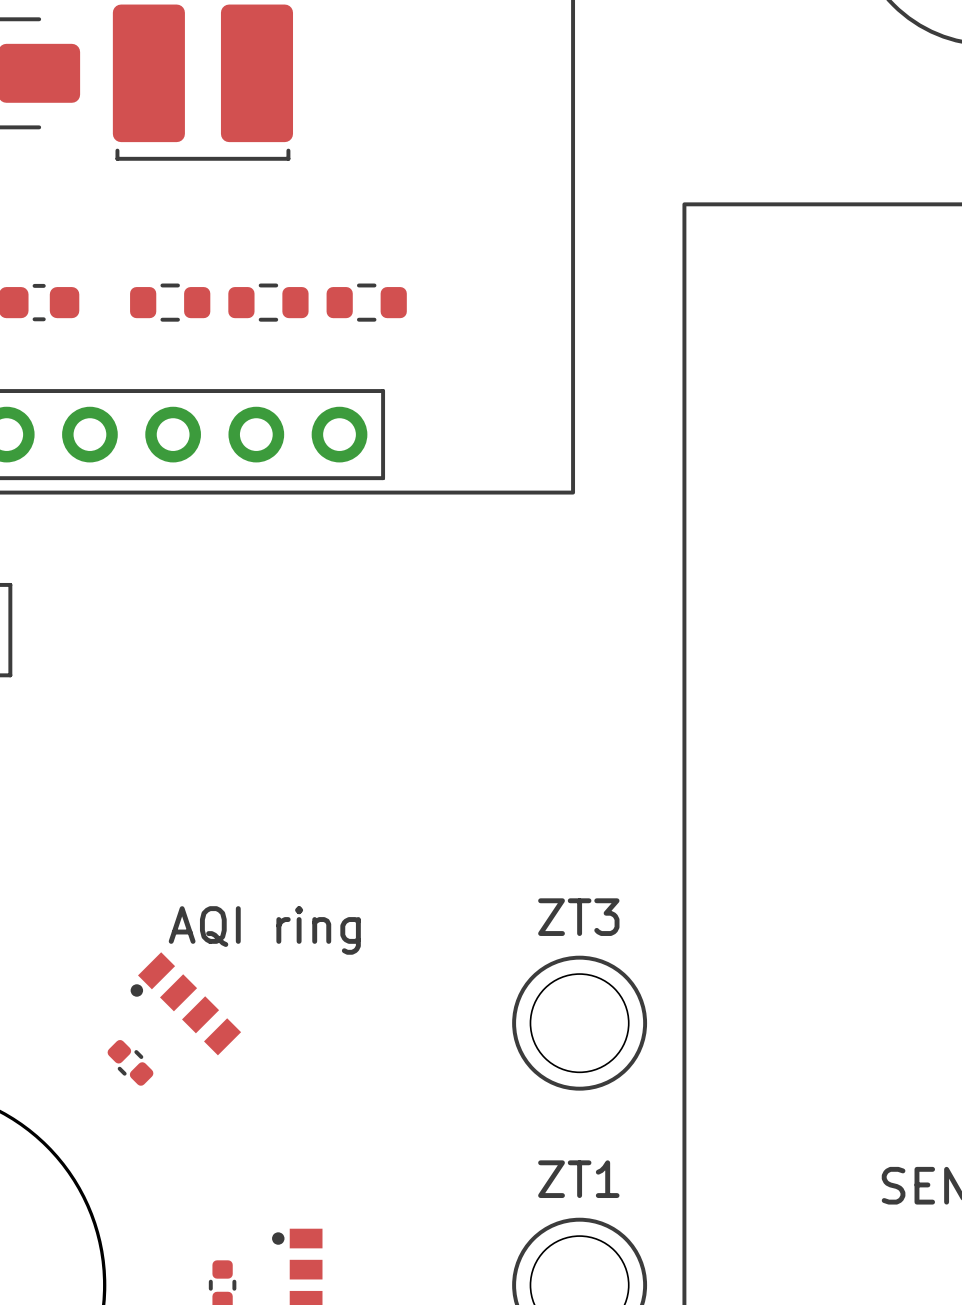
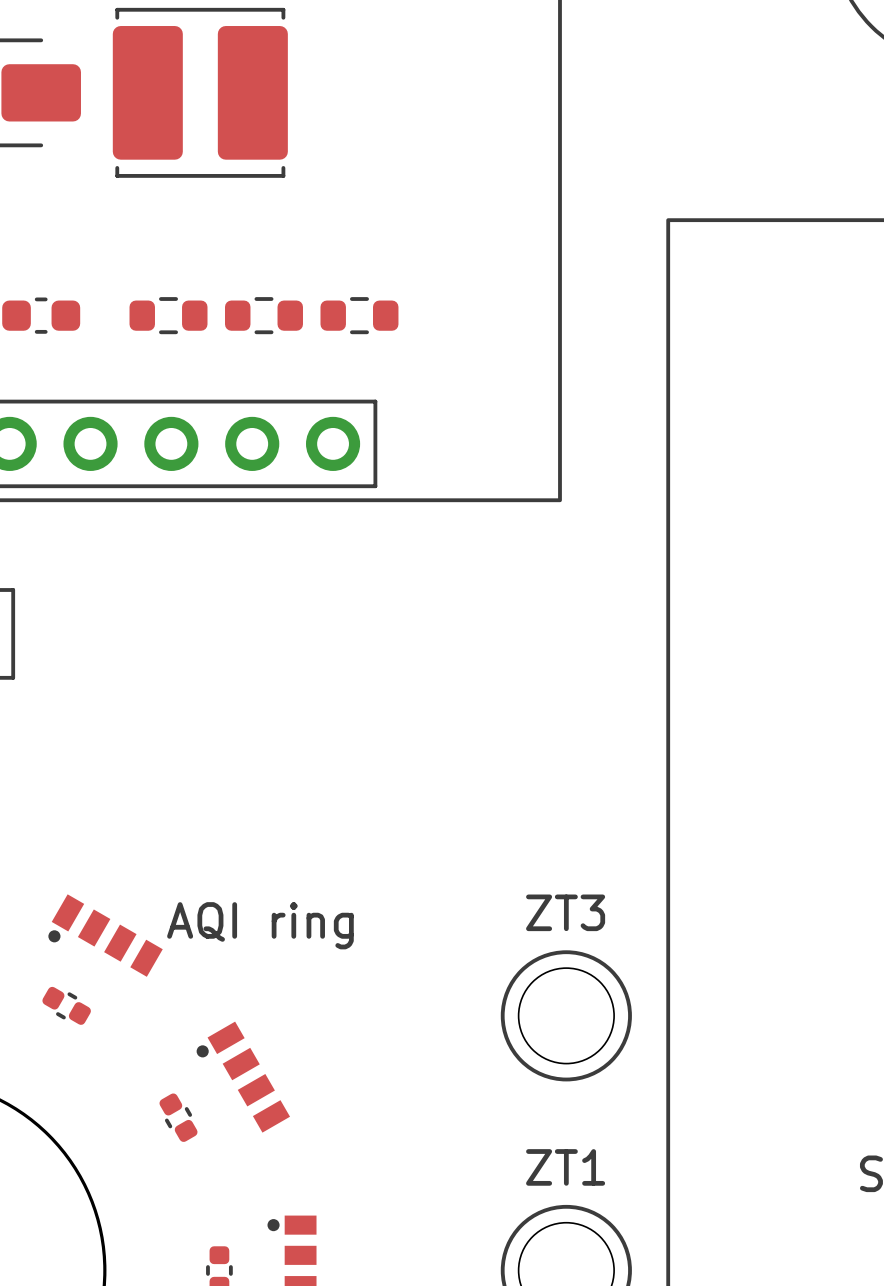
part: none -> (105, 935)
part: (185, 1003) -> none
part: none -> (66, 1005)
part: (130, 1062) -> none
part: none -> (243, 1077)
part: none -> (178, 1117)

